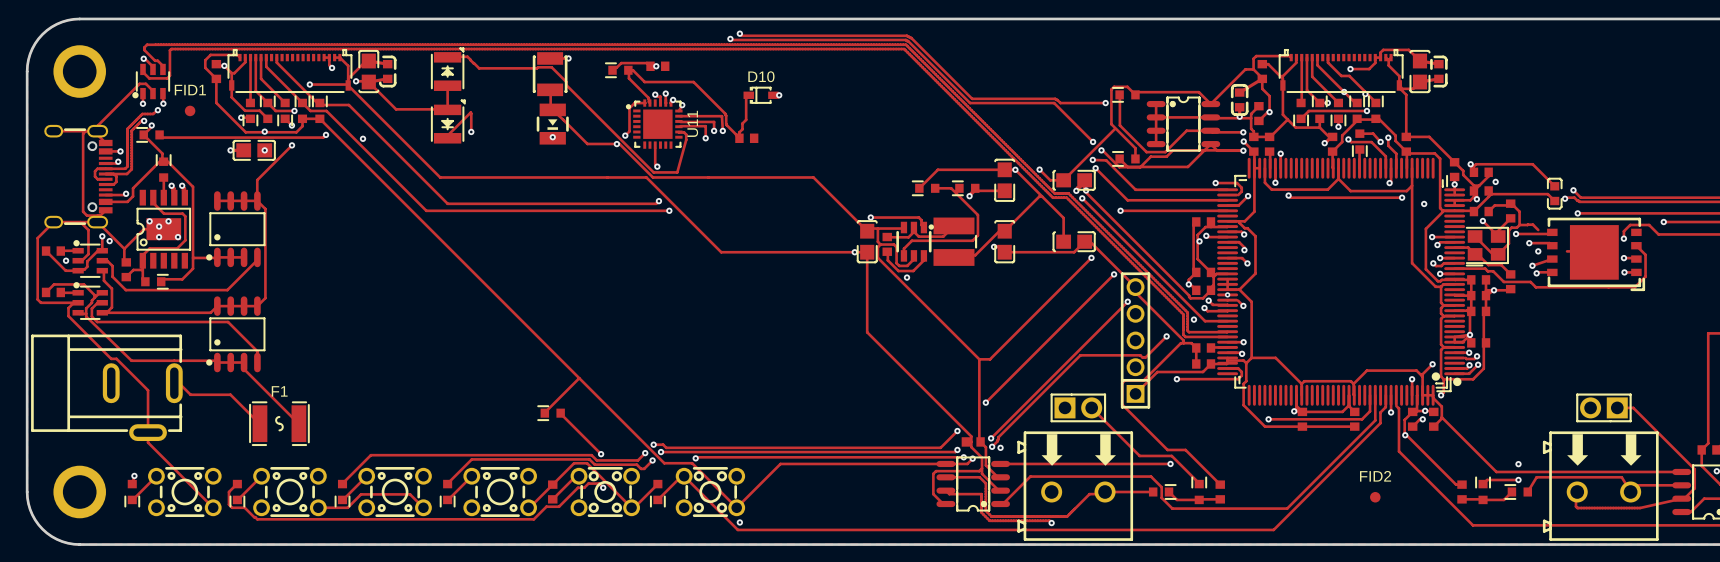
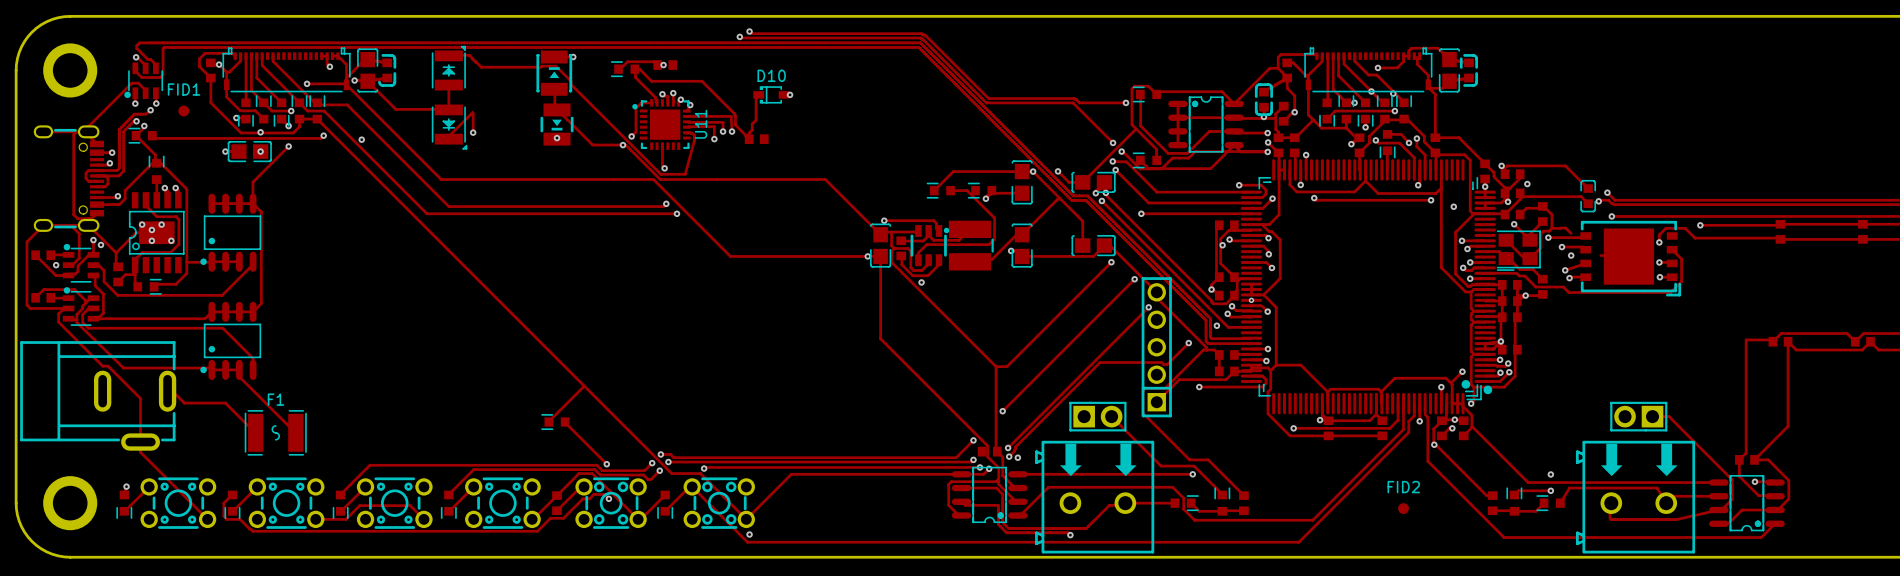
part footprint: [532, 52, 568, 97] -> [536, 50, 573, 96]
part footprint: [431, 99, 466, 144] -> [431, 104, 468, 150]

